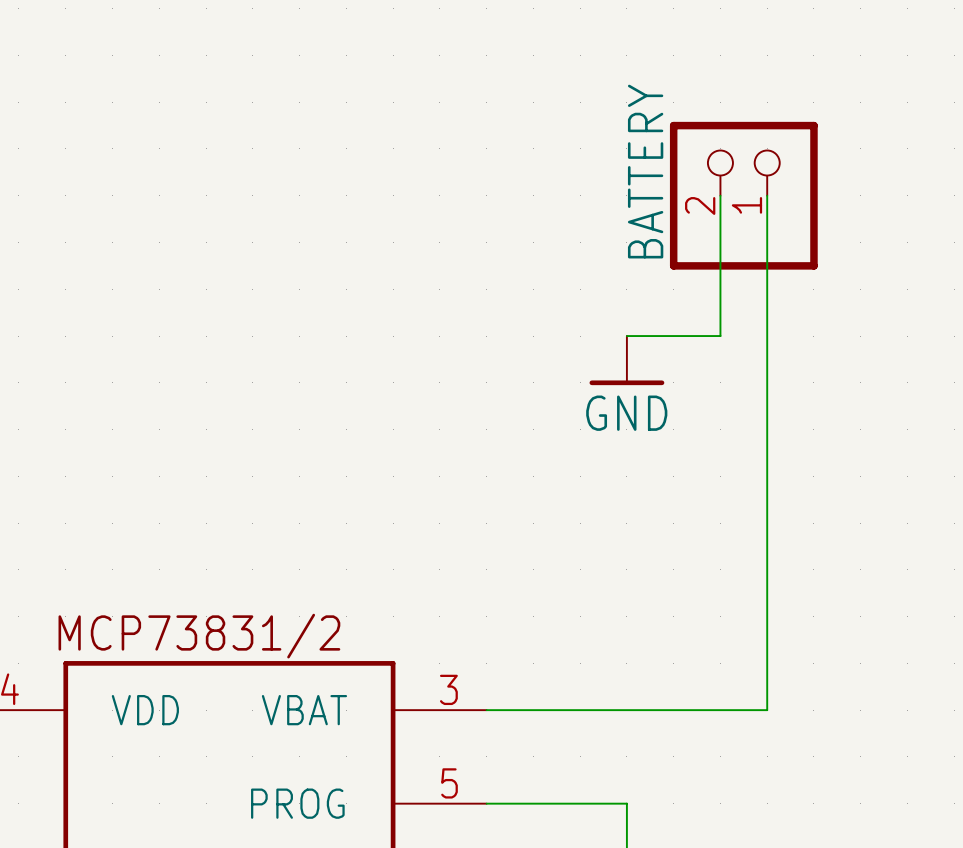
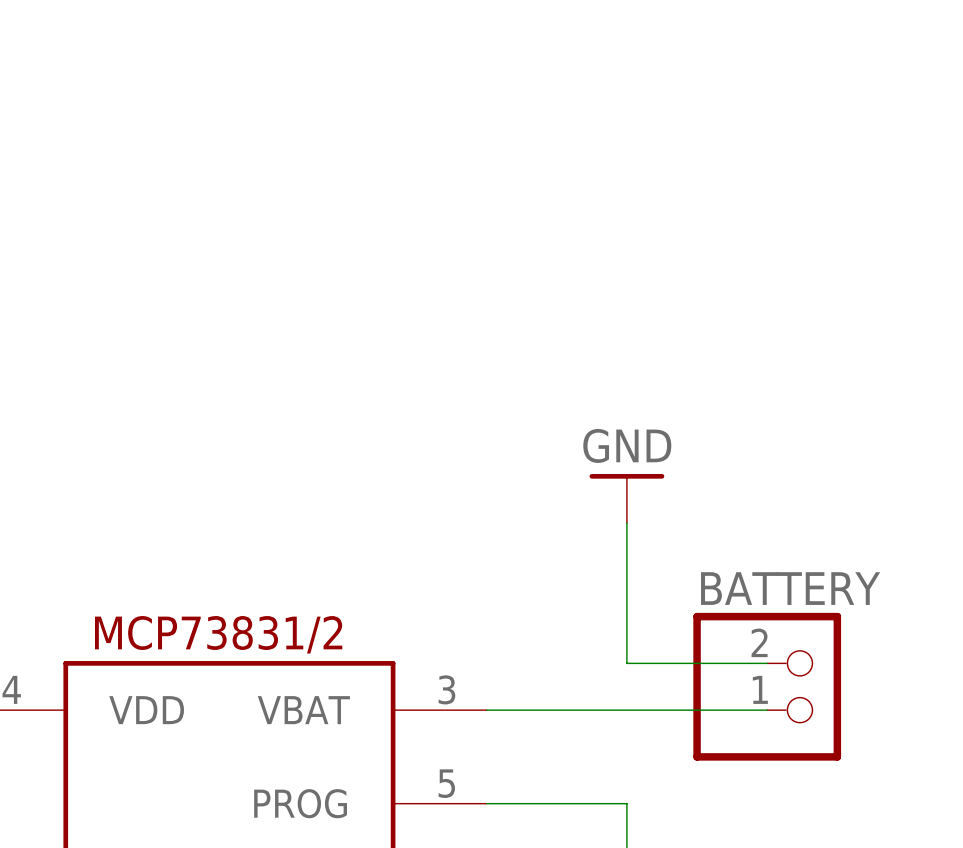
wire: (720, 195) (720, 336) (626, 336) -> none
BATTERY: (743, 195) -> none
wire: (767, 195) (767, 710) -> none
power symbol position: GND (626, 360) -> GND (626, 498)
power symbol rotation: 0° (626, 382) -> 180° (626, 476)
wire: none -> (626, 523) (626, 663) (767, 663)
BATTERY: none -> (767, 686)

